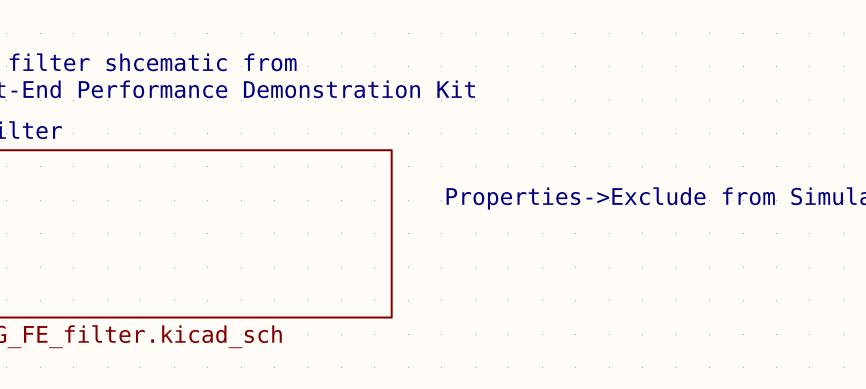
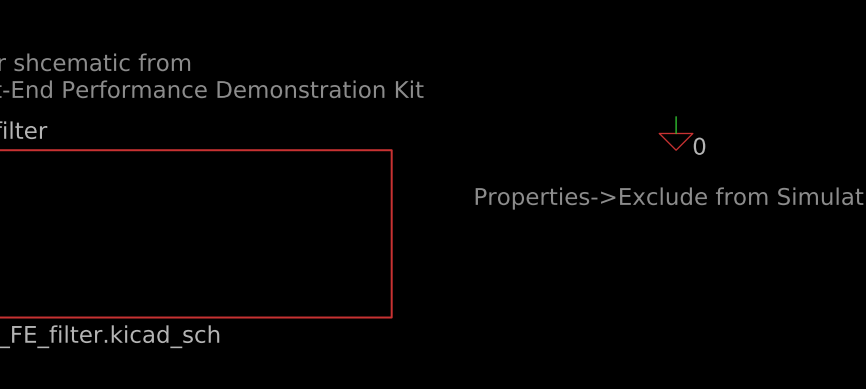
wire: none -> (676, 116) (676, 133)
power symbol: none -> 0 (676, 141)

